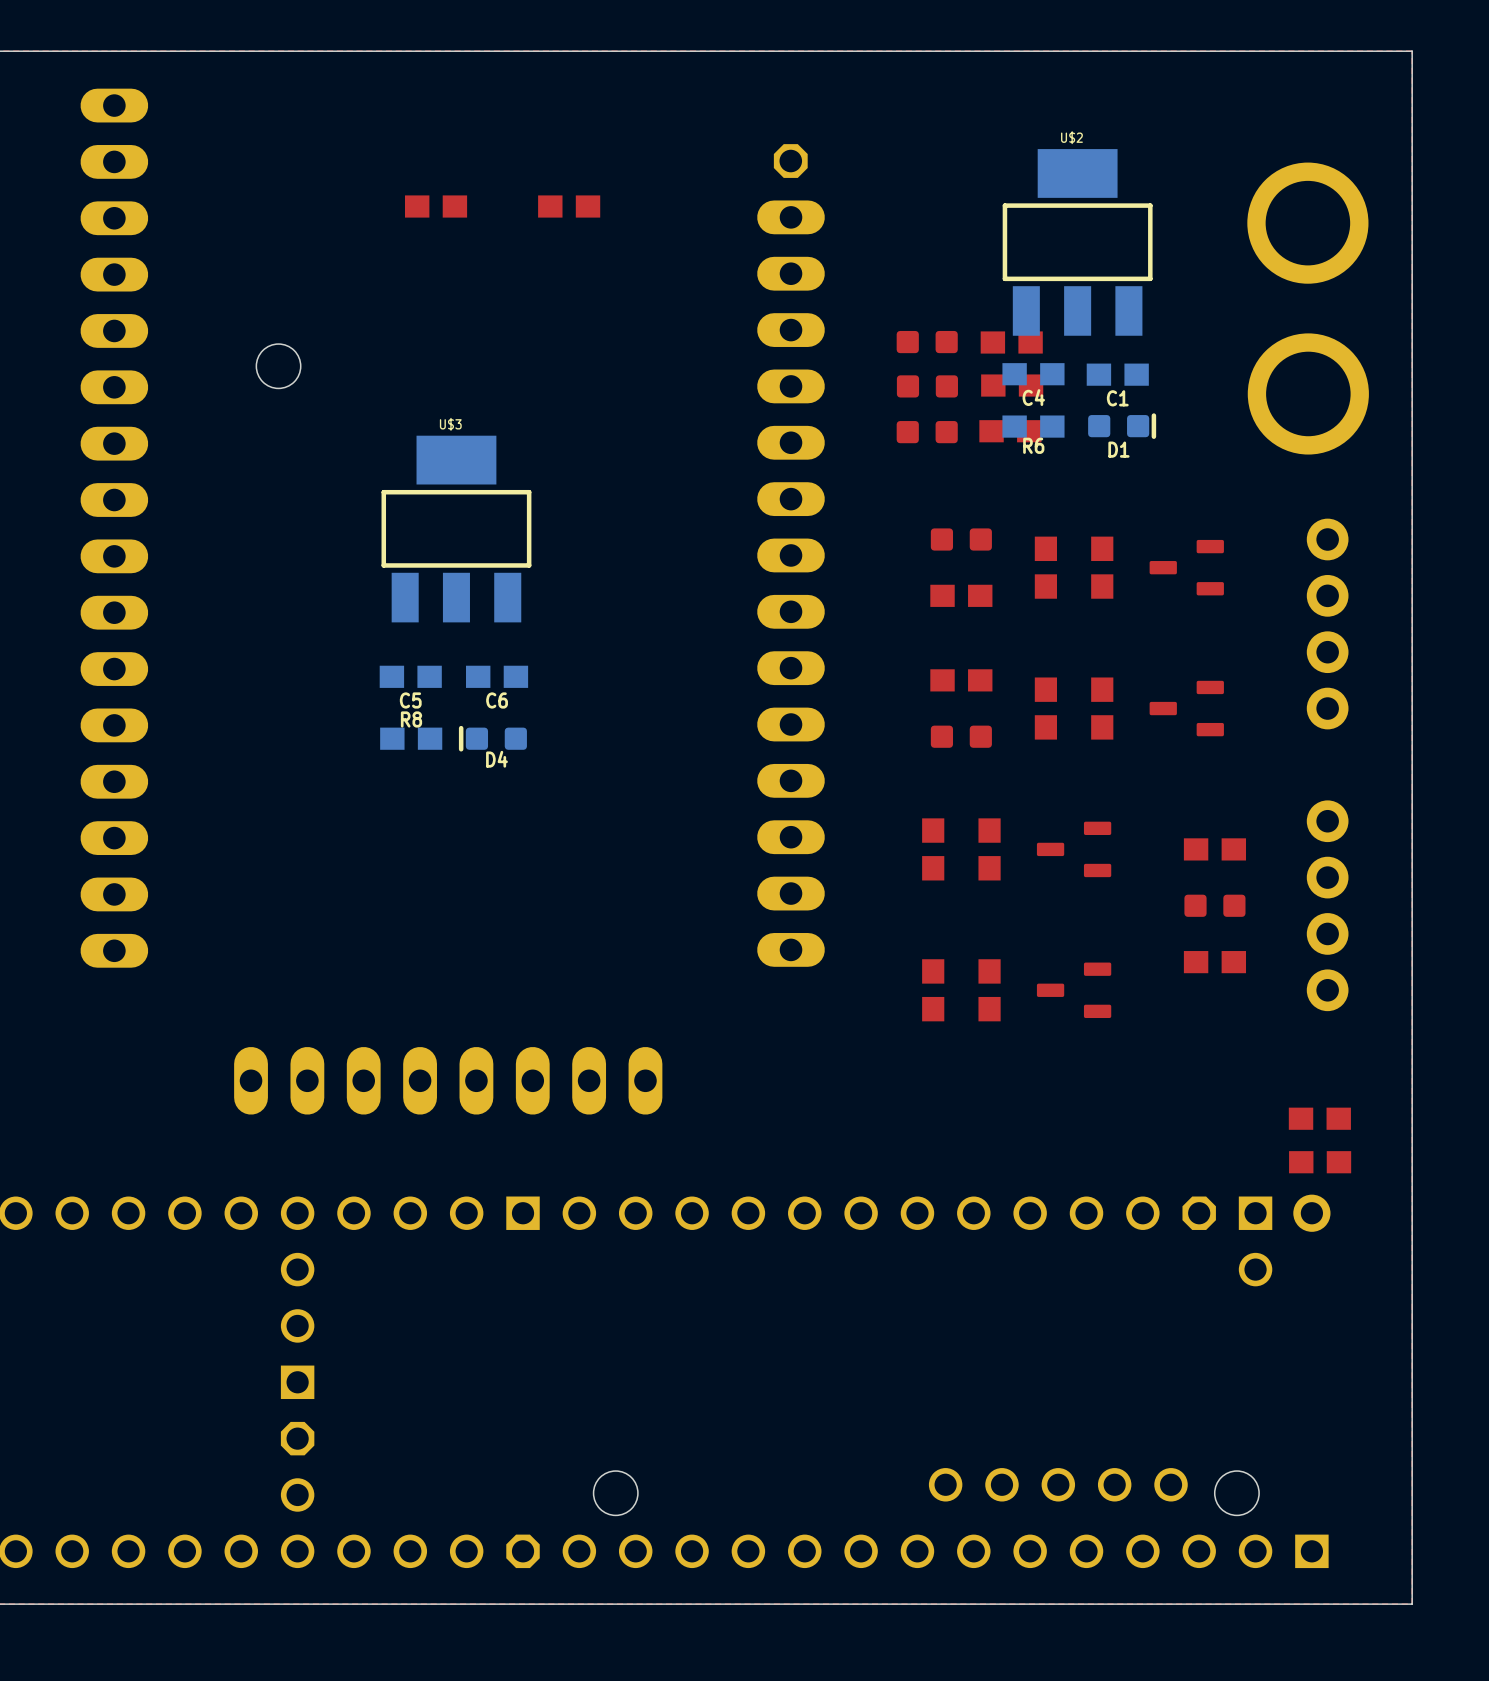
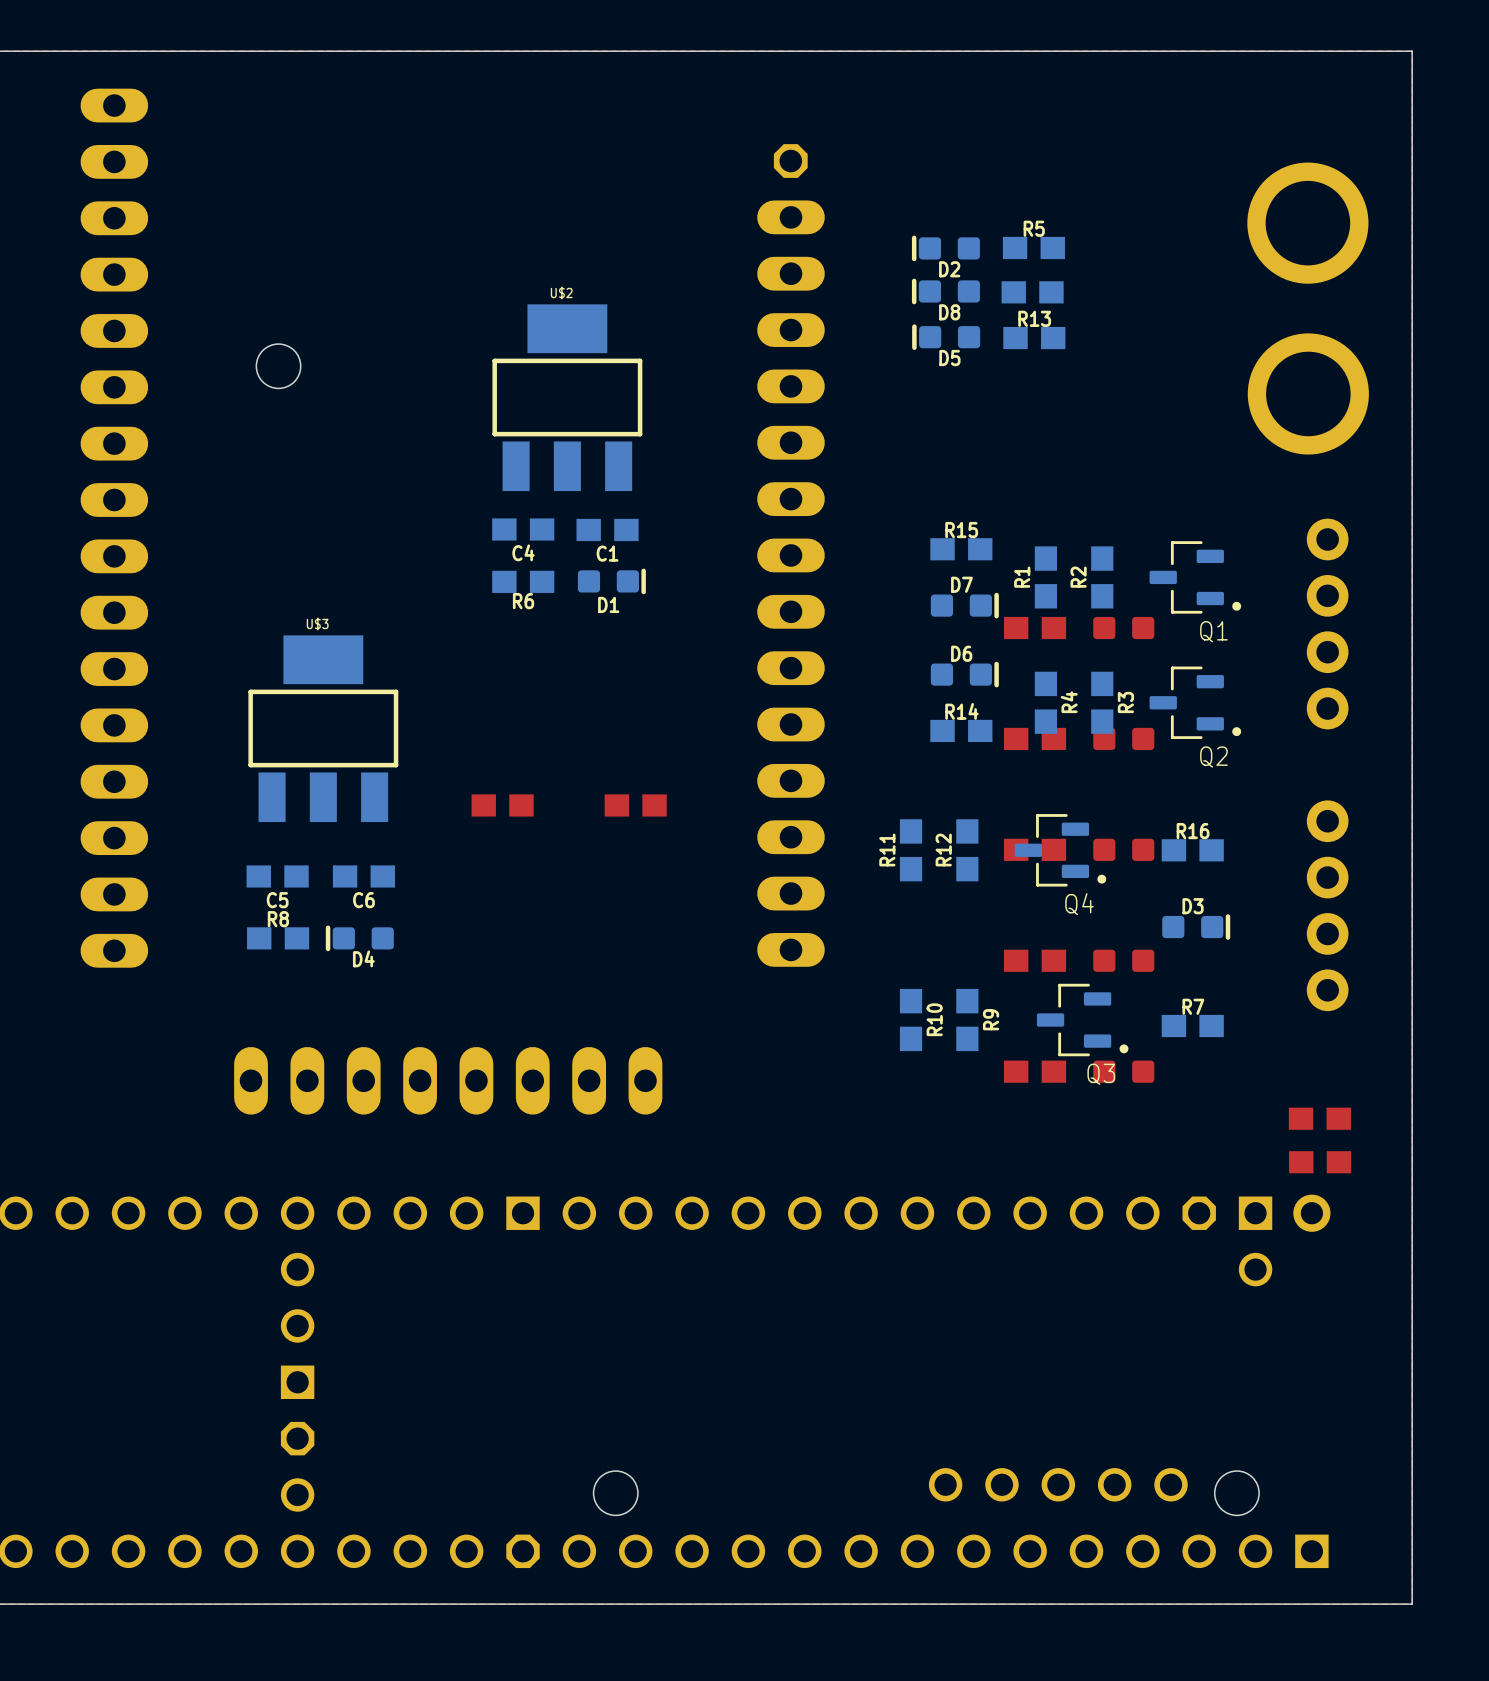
part: (436, 206) -> none
part: (569, 206) -> none
U$2 position: (1077, 242) -> (567, 397)
D2 side: top (927, 342) -> bottom (945, 248)
R5 side: top (1011, 342) -> bottom (1033, 247)
C4 position: (1033, 374) -> (523, 529)
C1 position: (1117, 374) -> (607, 529)
R13 side: top (1012, 385) -> bottom (1034, 338)
D5 side: top (927, 386) -> bottom (946, 337)
R6 position: (1033, 426) -> (523, 581)
D1 position: (1122, 426) -> (611, 581)
part side: top (1010, 431) -> bottom (1032, 292)
D8 side: top (927, 432) -> bottom (945, 291)
U$3 position: (456, 529) -> (323, 728)
D7 side: top (961, 539) -> bottom (964, 605)
R1 side: top (1045, 567) -> bottom (1045, 577)
R2 side: top (1102, 567) -> bottom (1102, 577)
Q1 side: top (1186, 567) -> bottom (1195, 577)
R15 side: top (961, 595) -> bottom (961, 549)
part: none -> (1035, 628)
part: none -> (1123, 628)
C5 position: (410, 676) -> (277, 876)
C6 position: (497, 676) -> (363, 876)
R14 side: top (961, 680) -> bottom (961, 730)
R4 side: top (1045, 708) -> bottom (1045, 702)
R3 side: top (1102, 708) -> bottom (1102, 702)
Q2 side: top (1186, 708) -> bottom (1195, 702)
D6 side: top (961, 736) -> bottom (964, 674)
R8 position: (411, 738) -> (278, 938)
D4 position: (492, 738) -> (359, 938)
part: none -> (1035, 738)
part: none -> (1123, 738)
part: none -> (502, 805)
part: none -> (635, 805)
R11 side: top (933, 849) -> bottom (911, 850)
R12 side: top (989, 849) -> bottom (967, 850)
part: none -> (1035, 849)
Q4 side: top (1074, 849) -> bottom (1060, 850)
part: none -> (1123, 849)
R16 side: top (1214, 849) -> bottom (1192, 850)
D3 side: top (1214, 905) -> bottom (1196, 927)
part: none -> (1035, 960)
part: none -> (1123, 960)
R7 side: top (1214, 962) -> bottom (1192, 1026)
R10 side: top (933, 990) -> bottom (911, 1020)
R9 side: top (989, 990) -> bottom (967, 1020)
Q3 side: top (1074, 990) -> bottom (1082, 1020)
part: none -> (1035, 1071)
part: none -> (1123, 1071)

